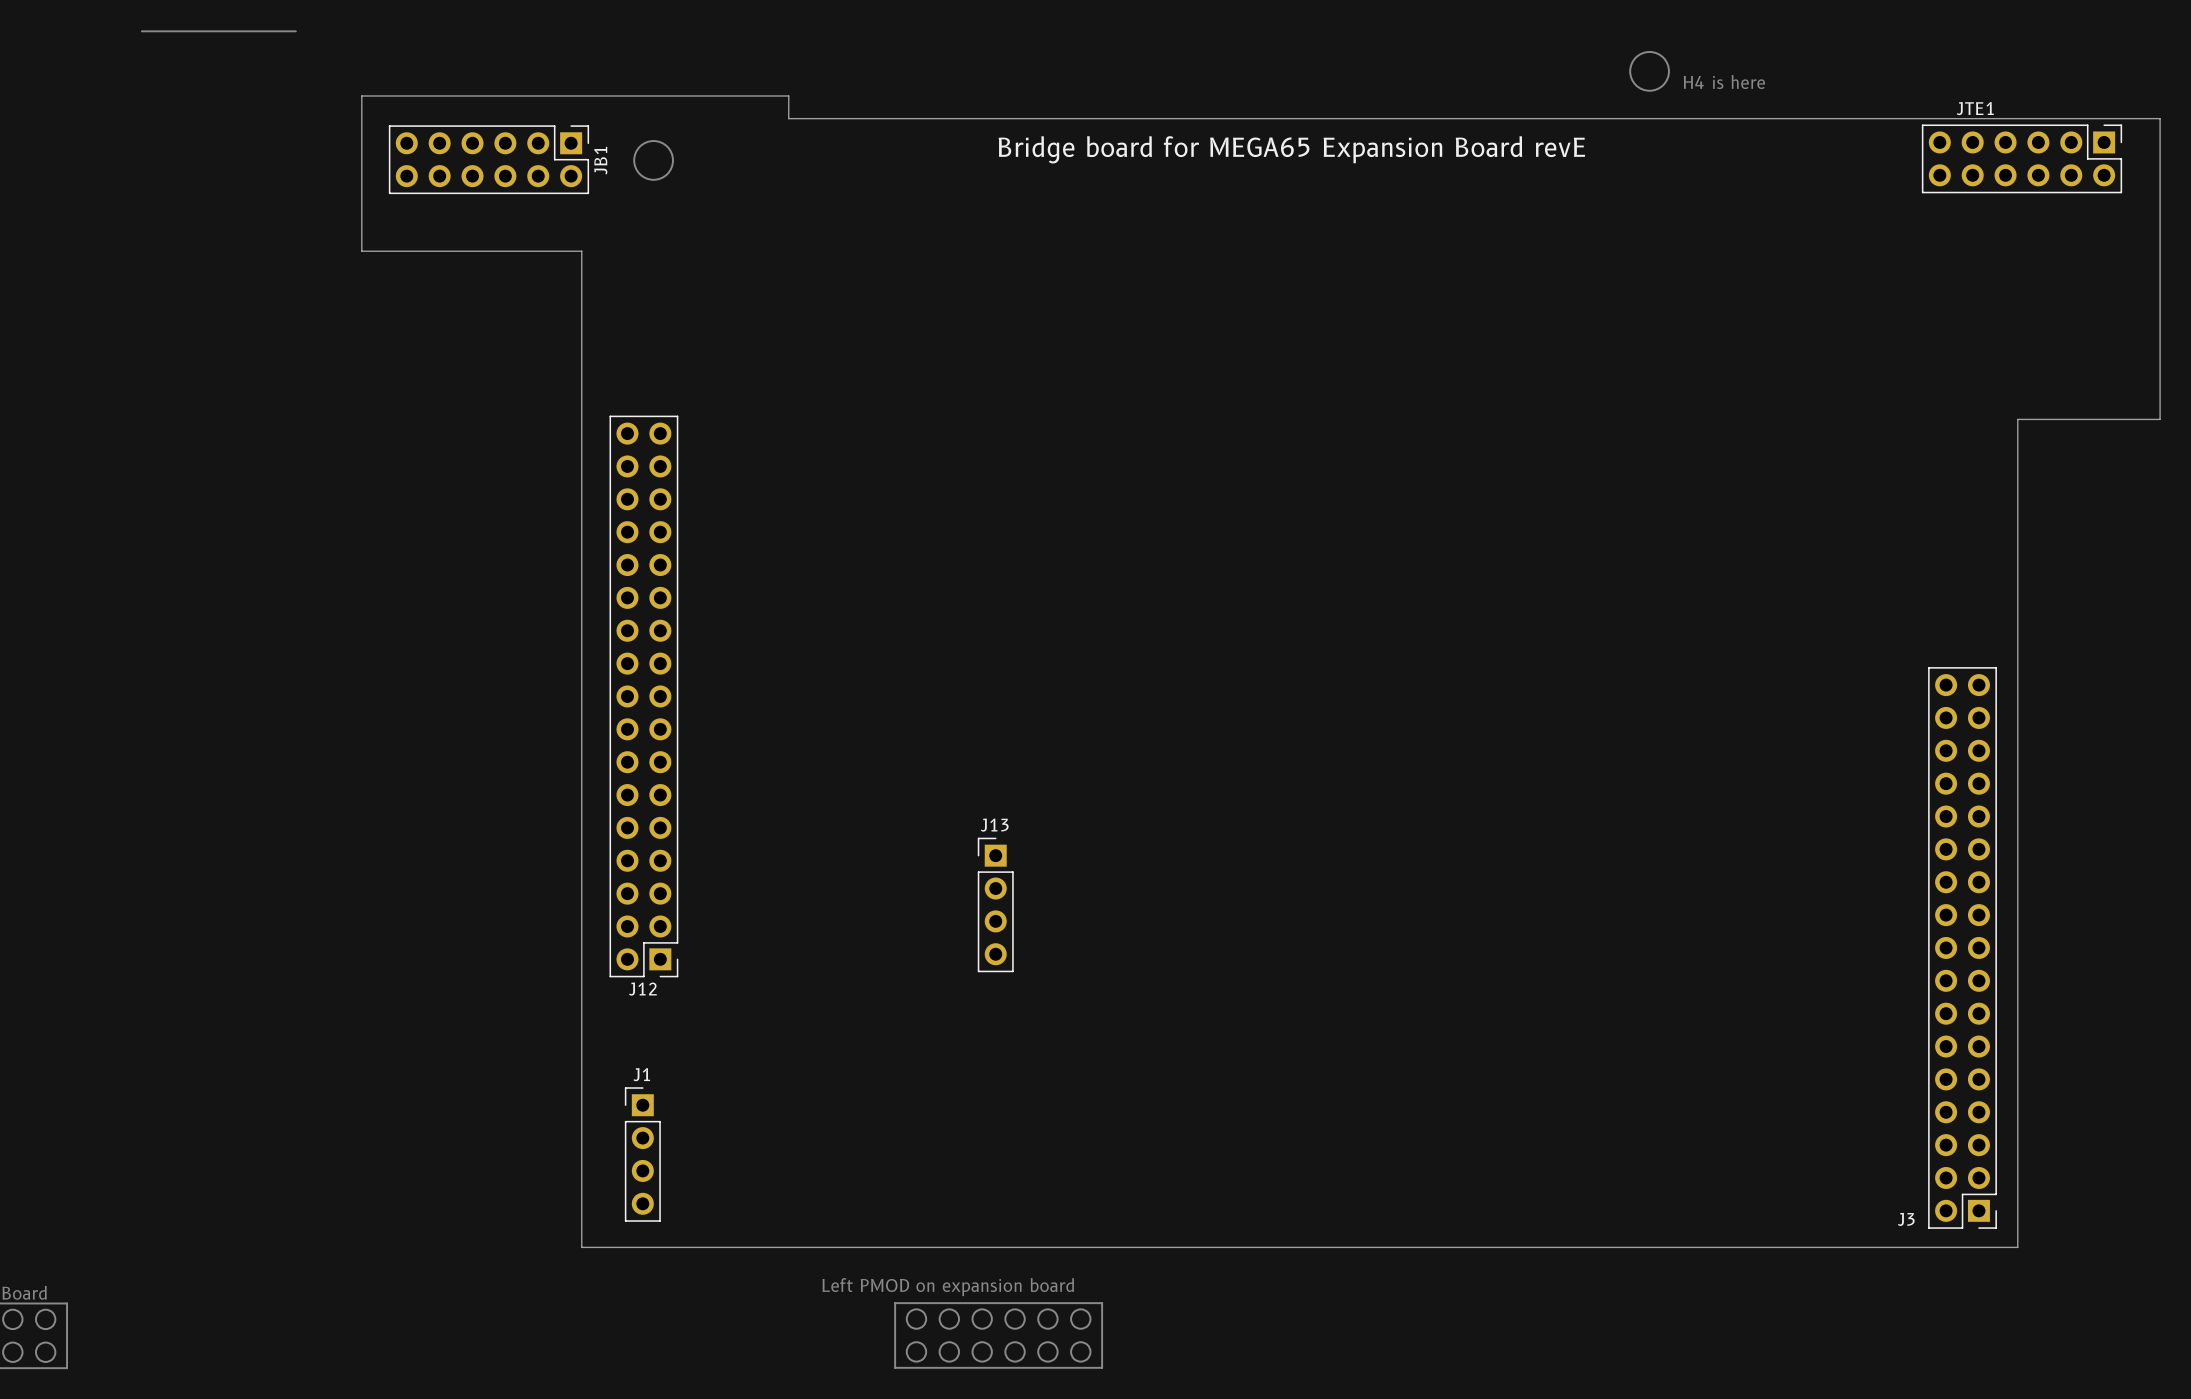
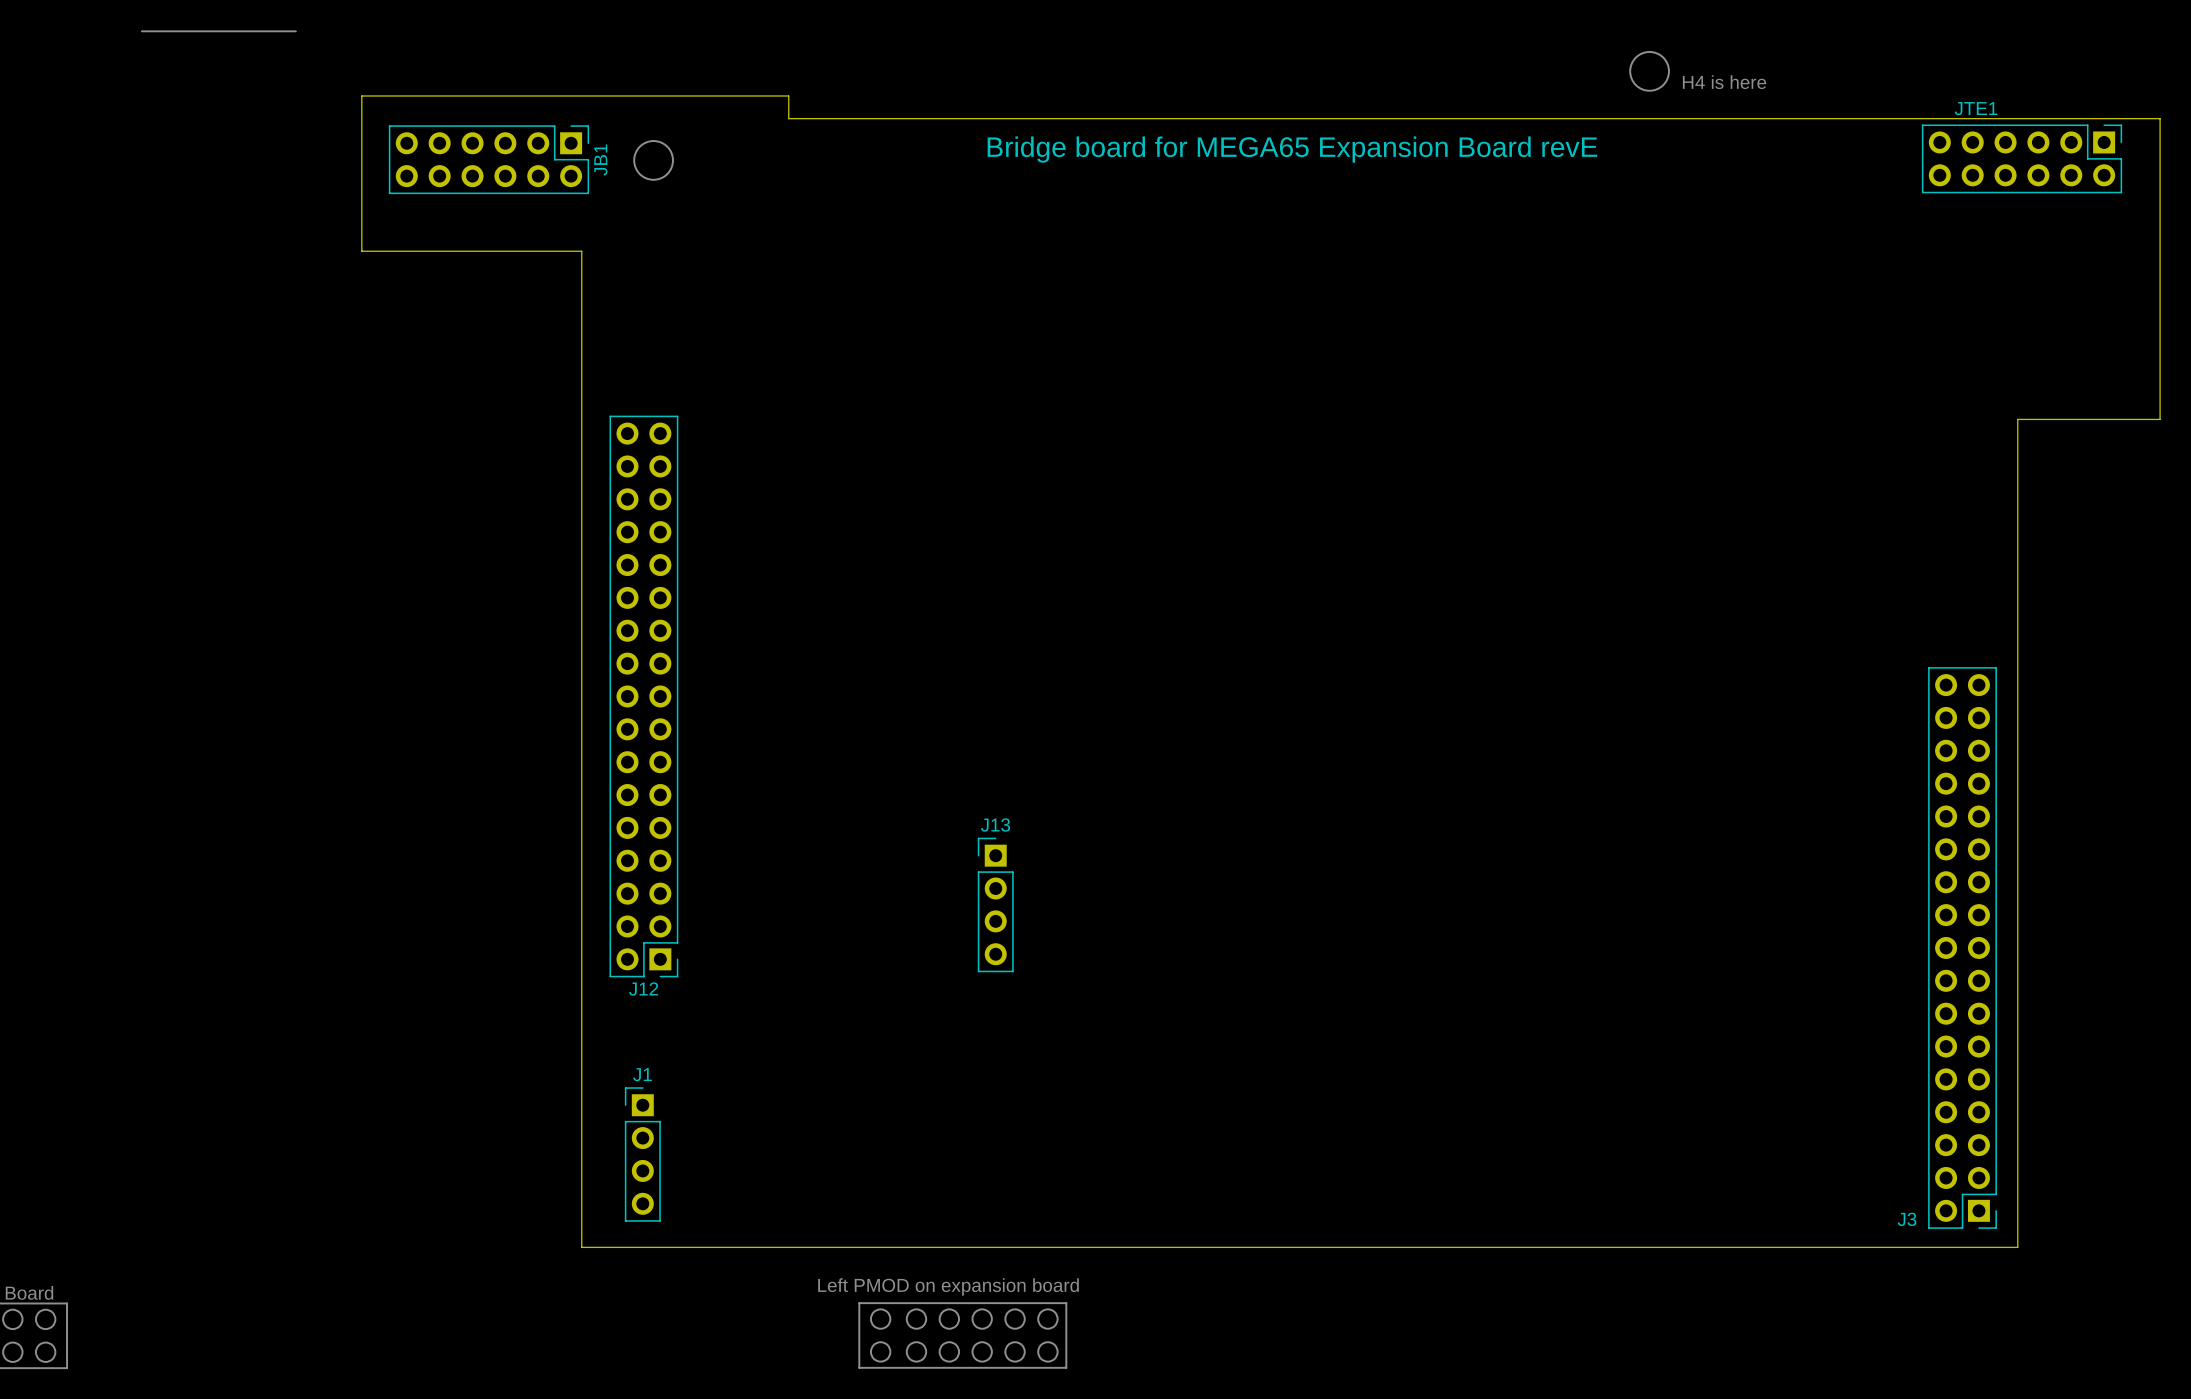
line: (895, 1303) (895, 1367) -> (895, 1303) (859, 1303) (859, 1367) (895, 1367)
line: (1066, 1303) (1102, 1303) (1102, 1367) (1066, 1367) -> (1066, 1303) (1066, 1367)
drawing: none -> [869, 1308, 892, 1363]
drawing: [1070, 1308, 1092, 1363] -> none

